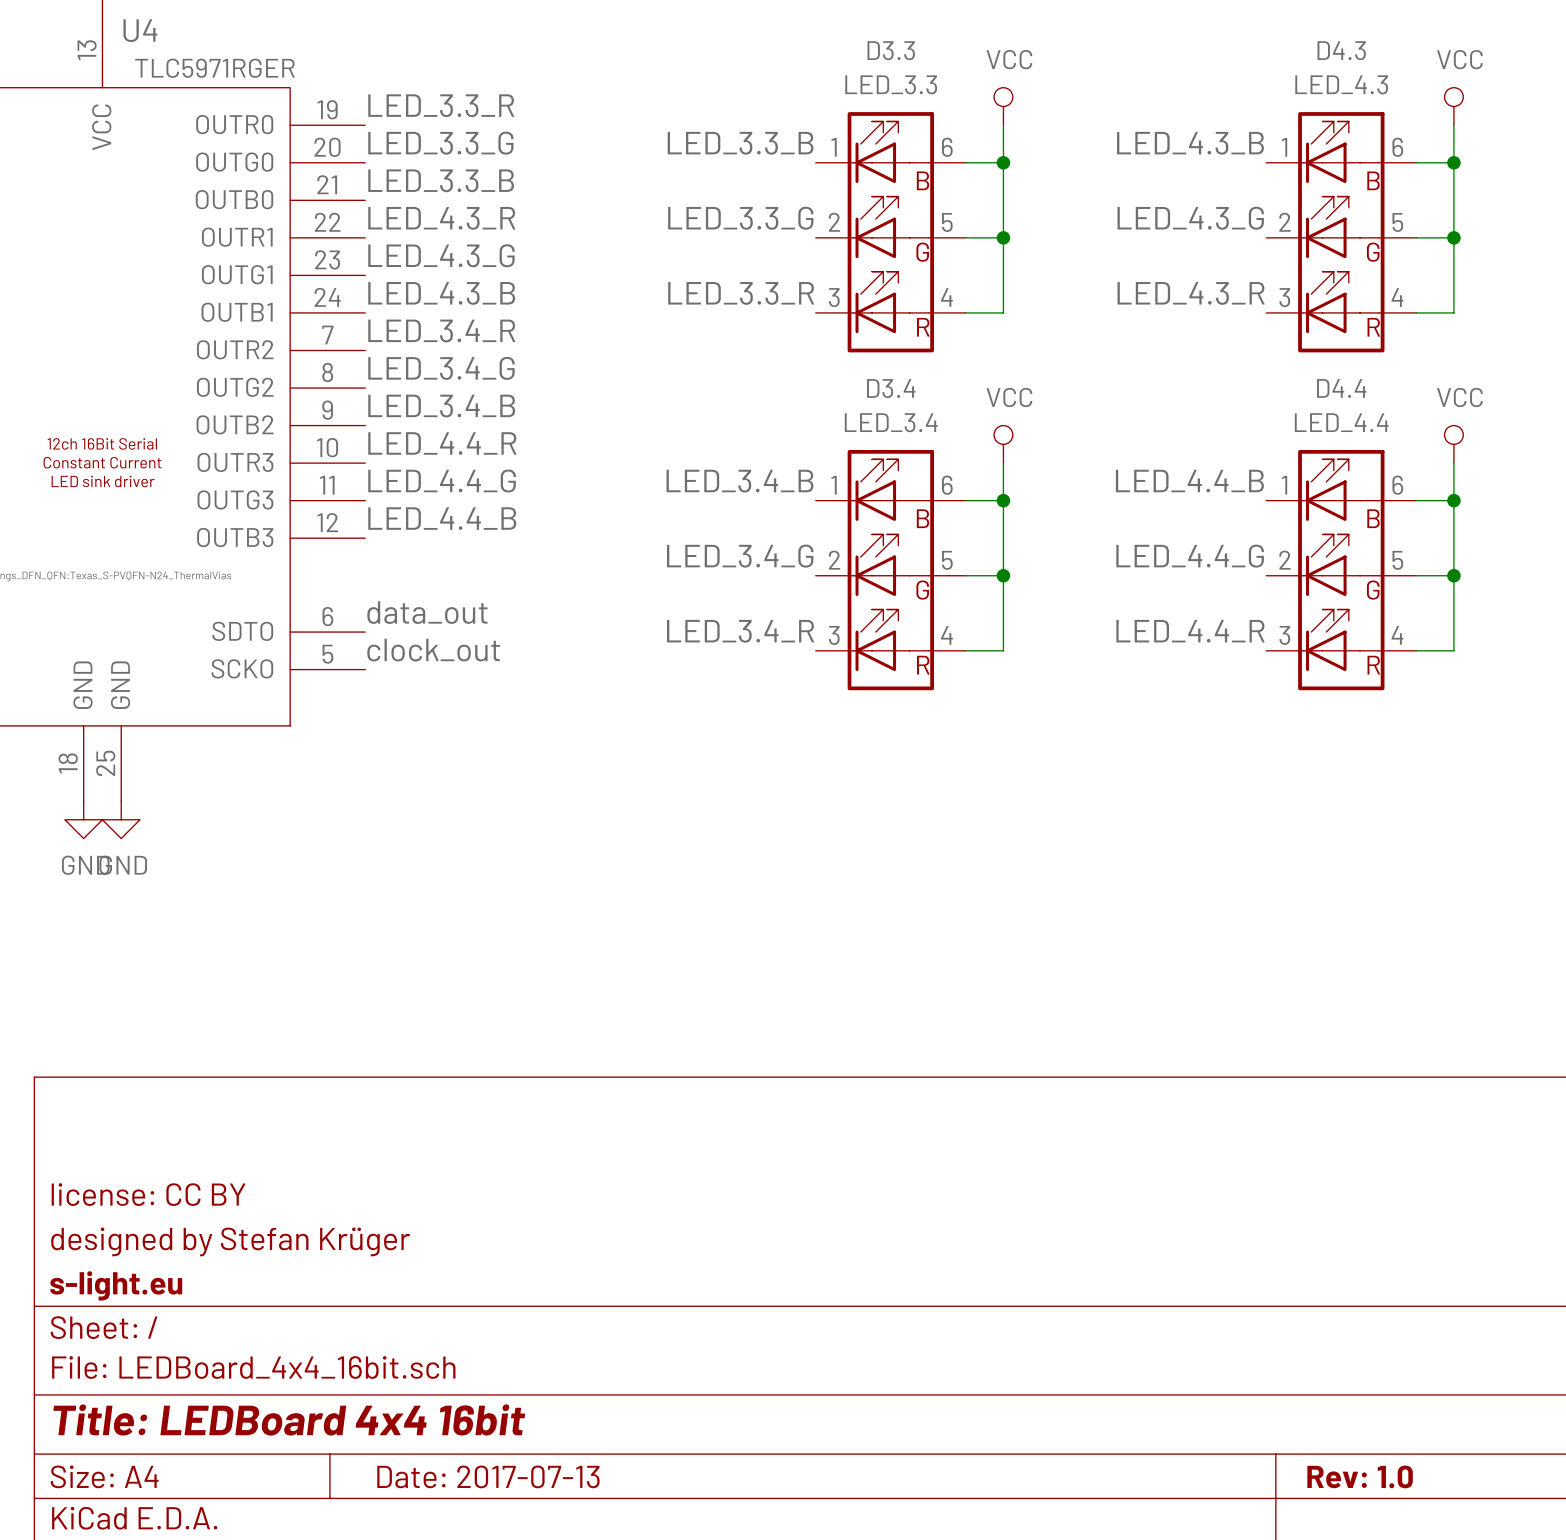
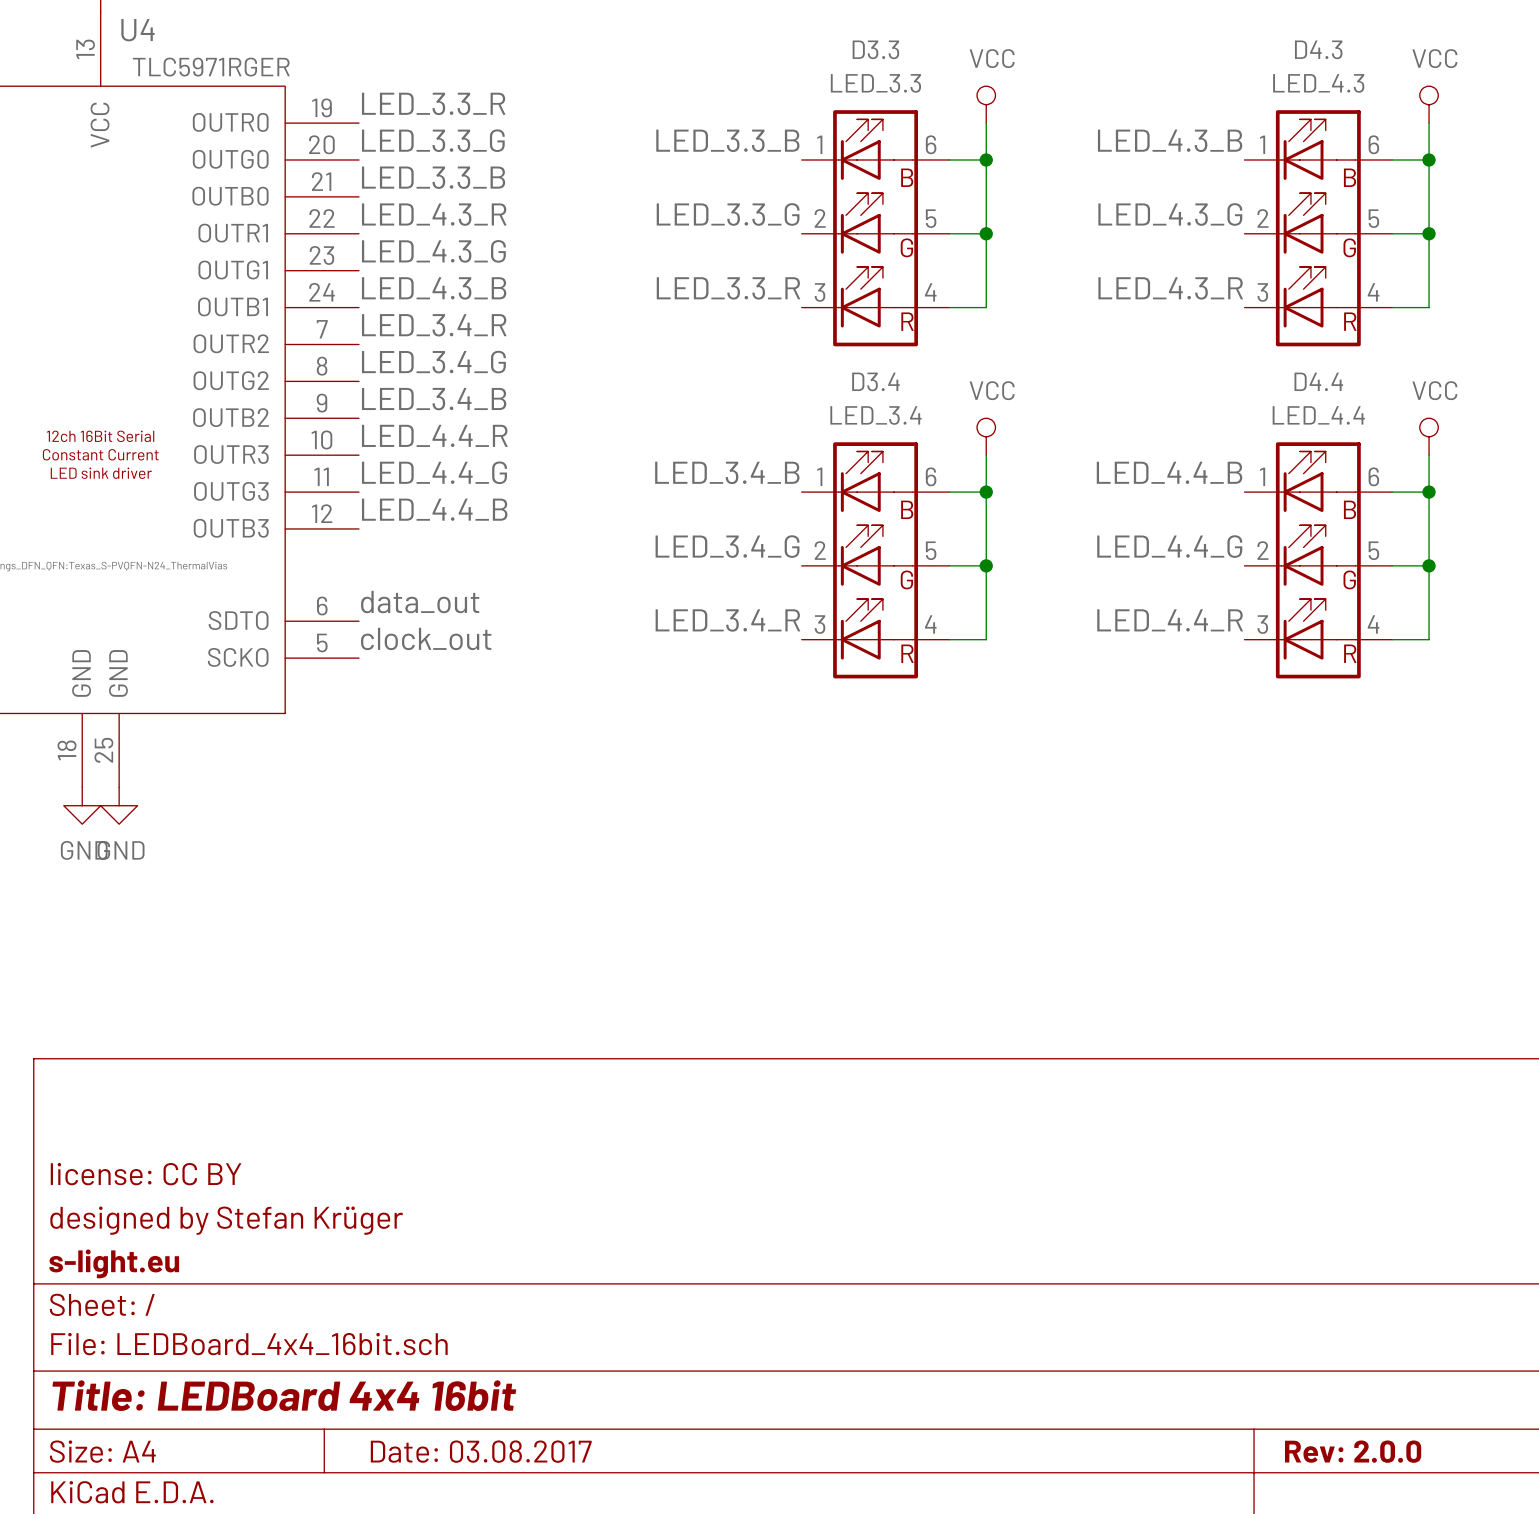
title block: Date: 2017-07-13 (488, 1476) -> Date: 03.08.2017 (481, 1451)
title block: Rev: 1.0 (1360, 1476) -> Rev: 2.0.0 (1353, 1451)

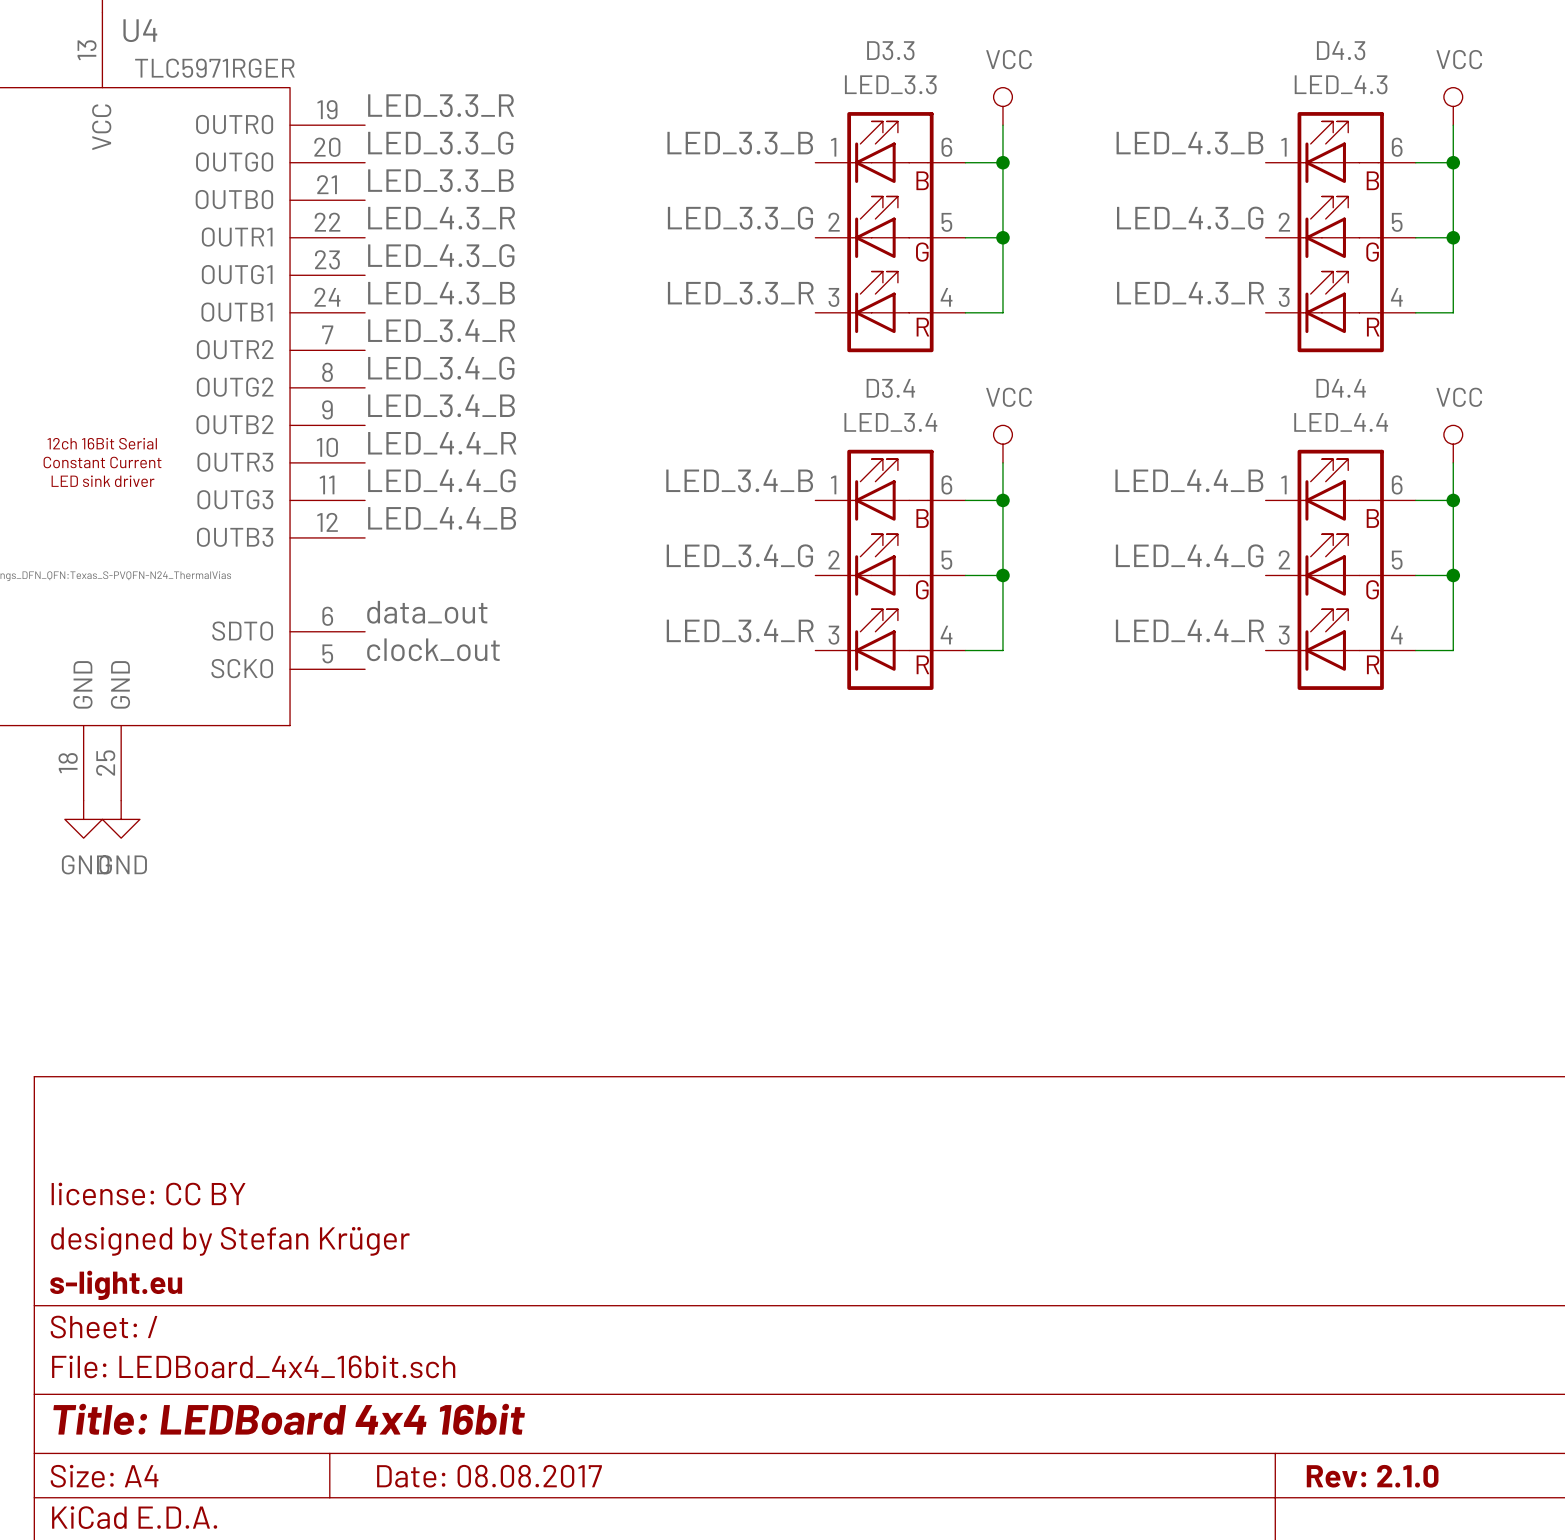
title block: Date: 03.08.2017 (481, 1451) -> Date: 08.08.2017 (489, 1476)
title block: Rev: 2.0.0 (1353, 1451) -> Rev: 2.1.0 (1372, 1476)

